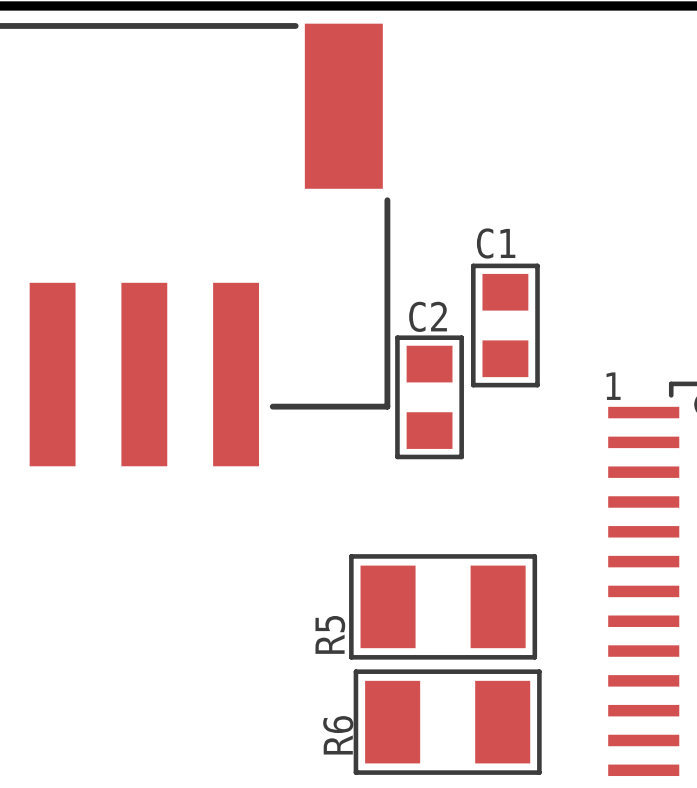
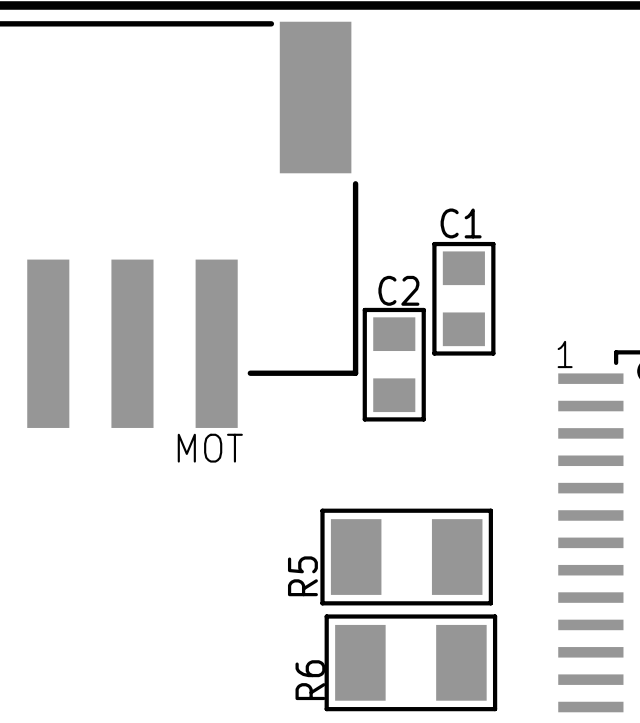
text: none -> MOT (210, 448)

